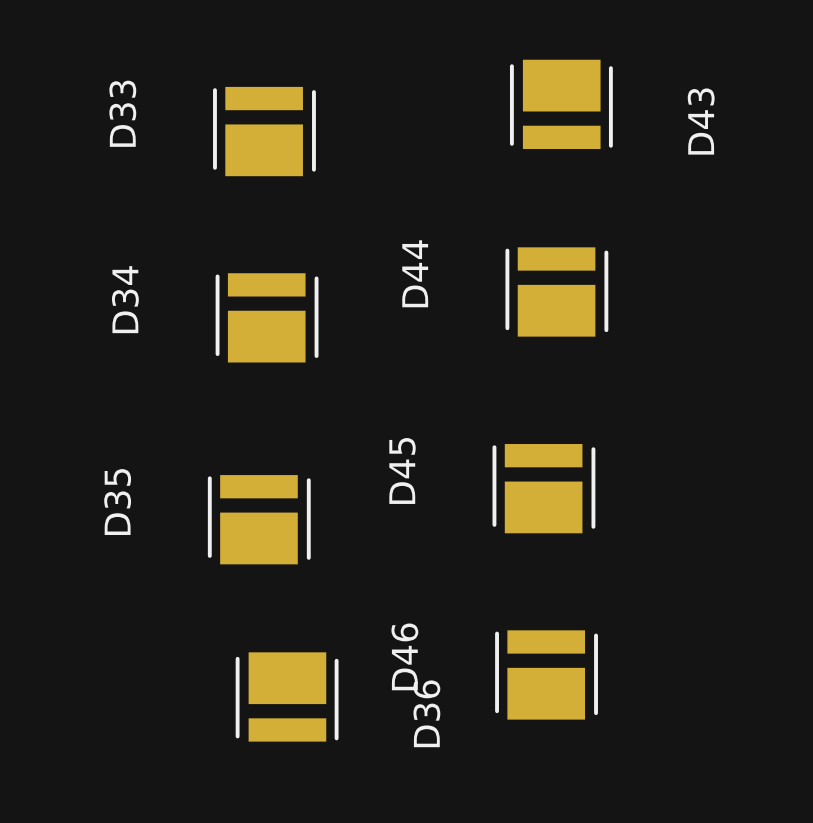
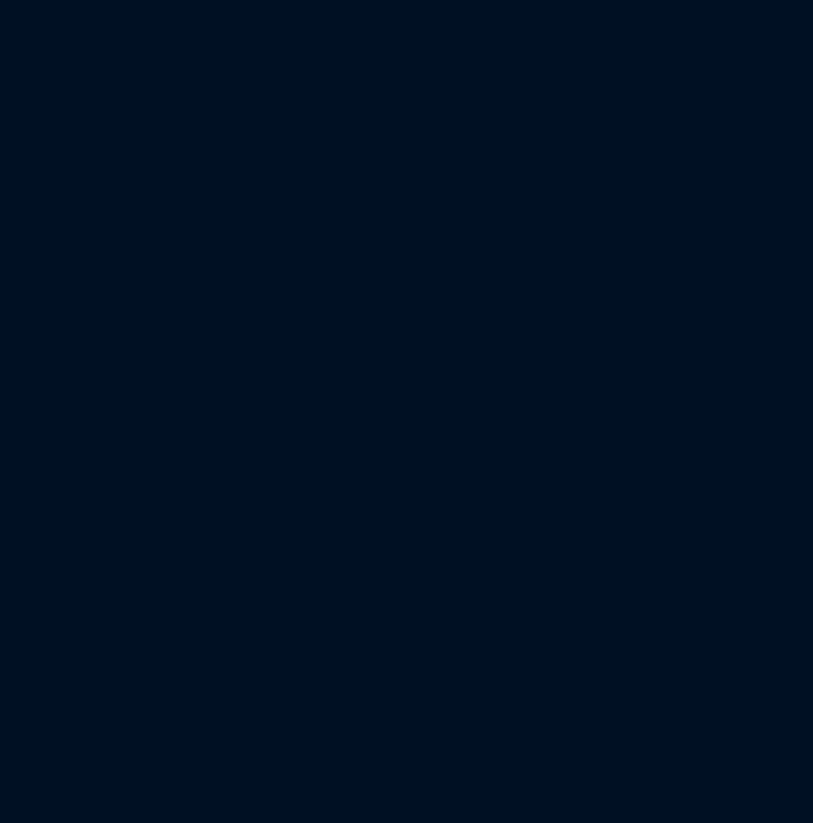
D43: (561, 104) -> none
D33: (264, 131) -> none
D44: (556, 291) -> none
D34: (267, 317) -> none
D45: (543, 488) -> none
D35: (259, 519) -> none
D46: (546, 674) -> none
D36: (287, 696) -> none

